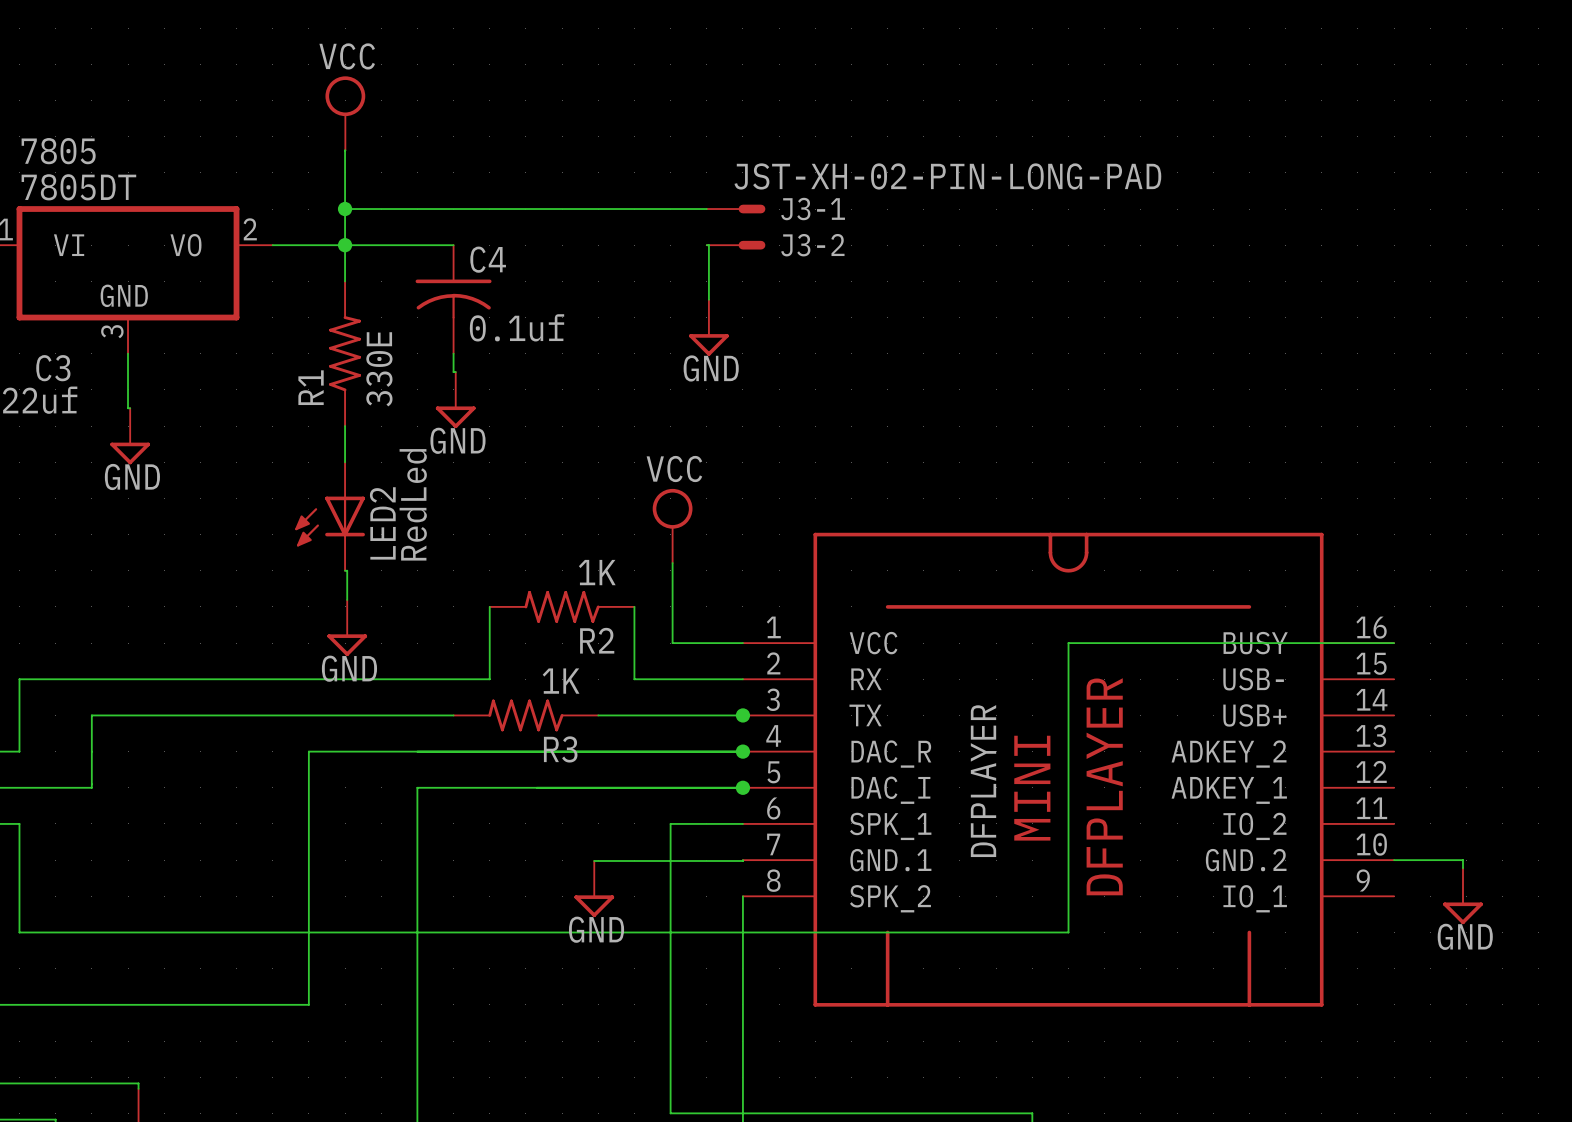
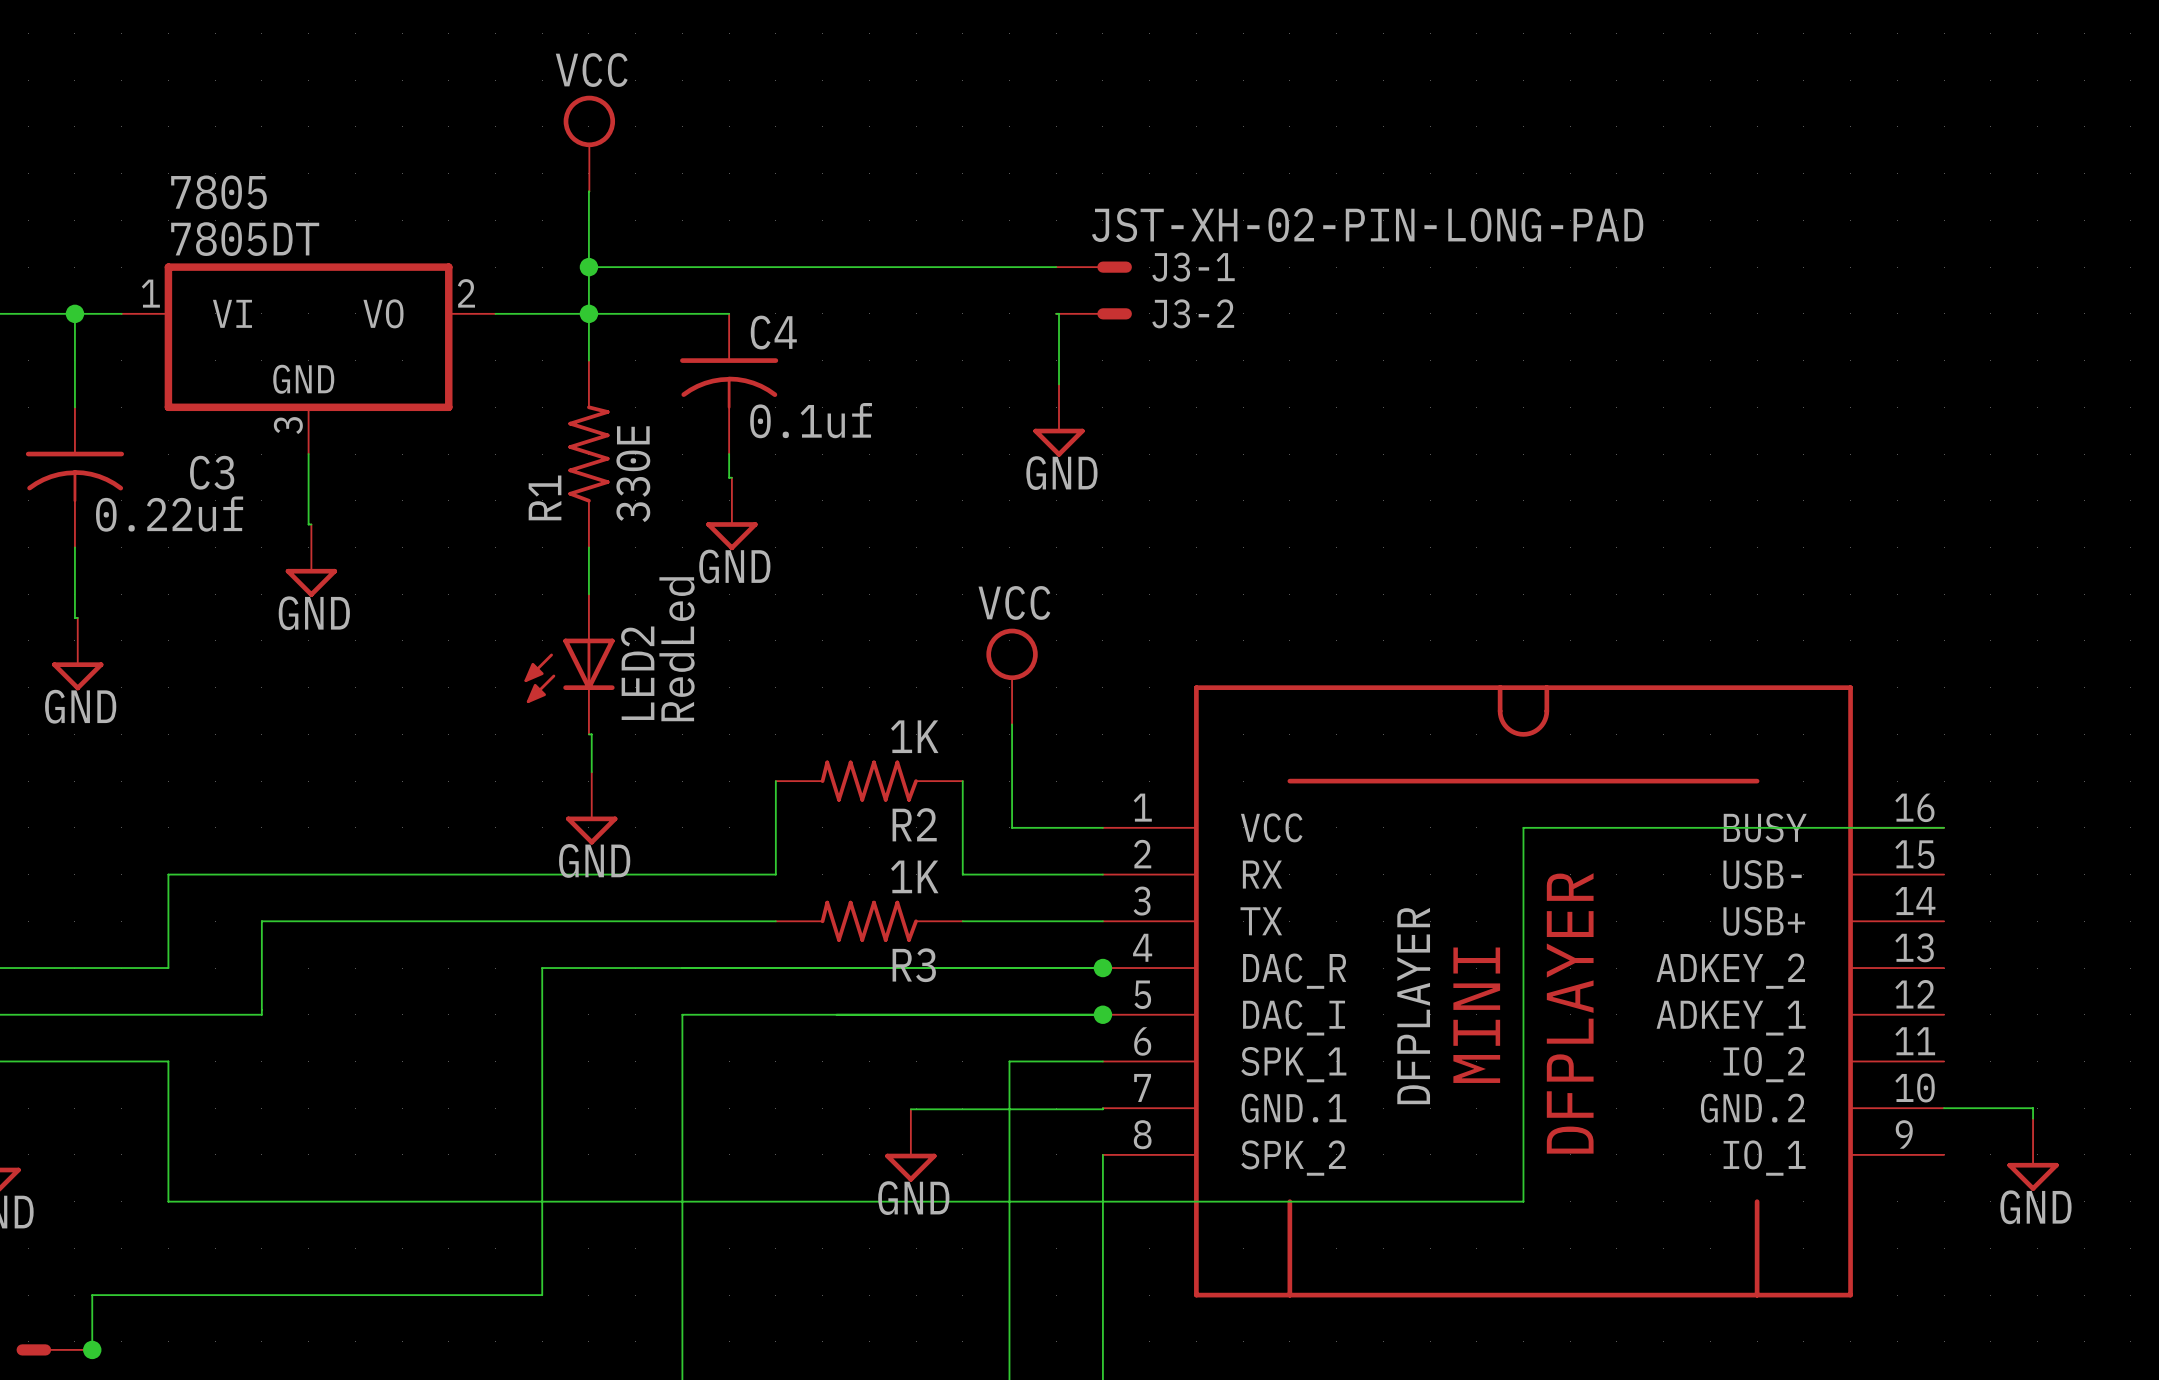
R3 position: (525, 715) -> (869, 921)
junction: (742, 715) -> none

